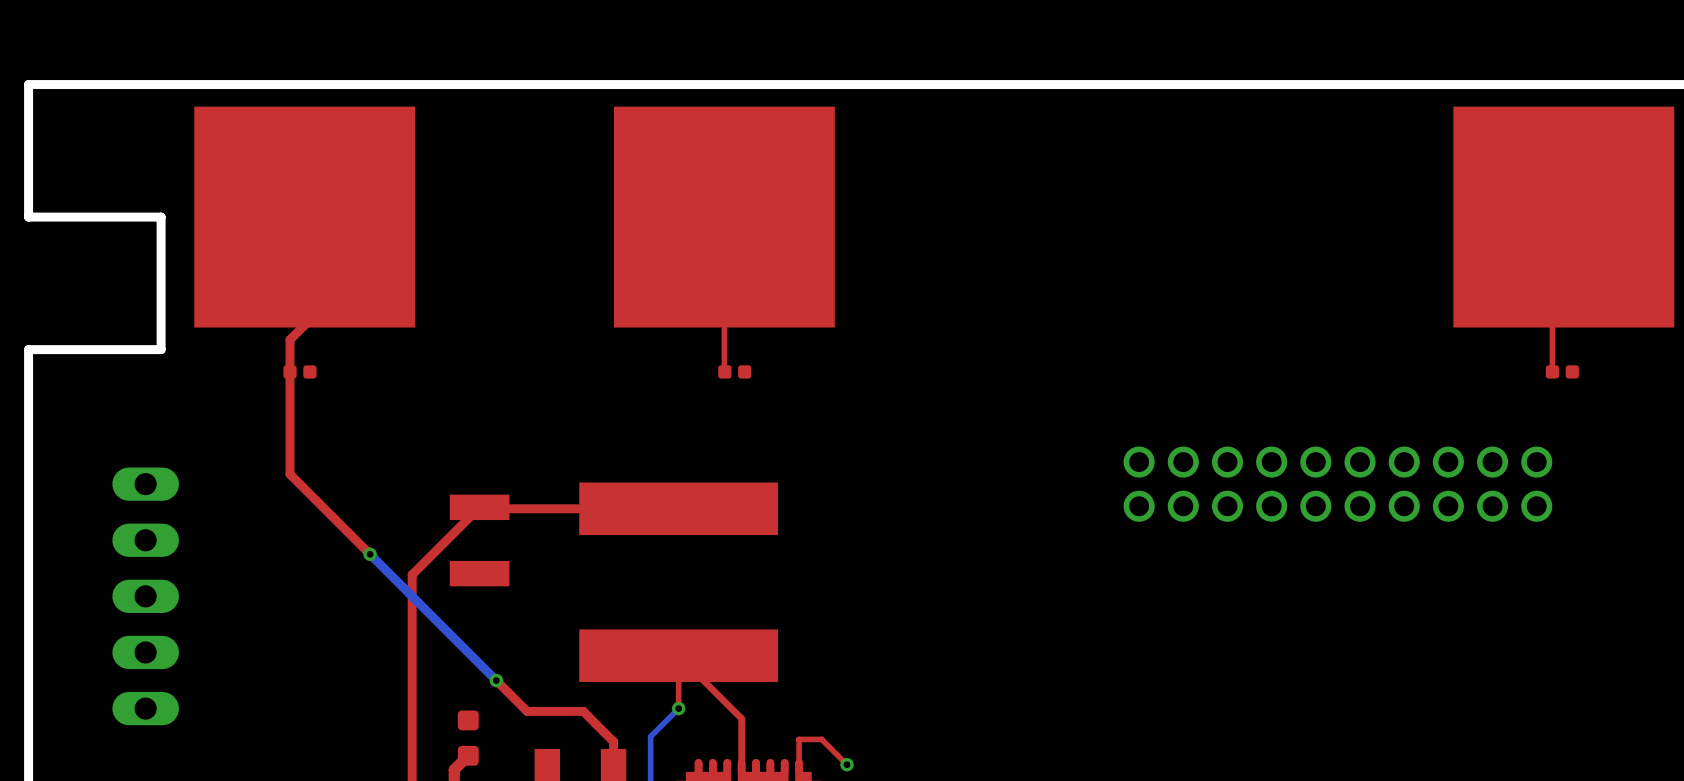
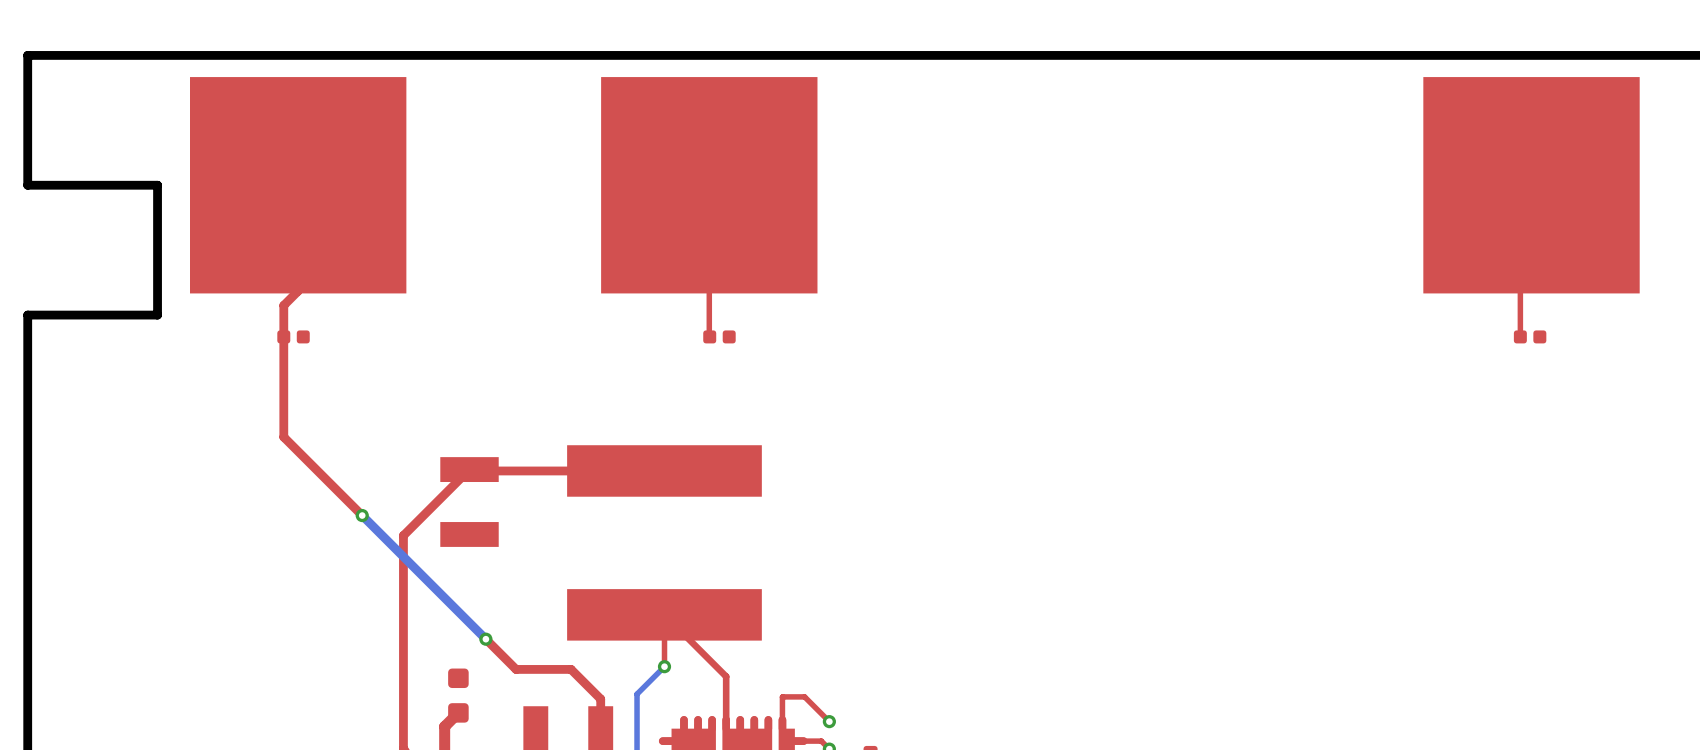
part: (1337, 484) -> none
part: (145, 596) -> none

